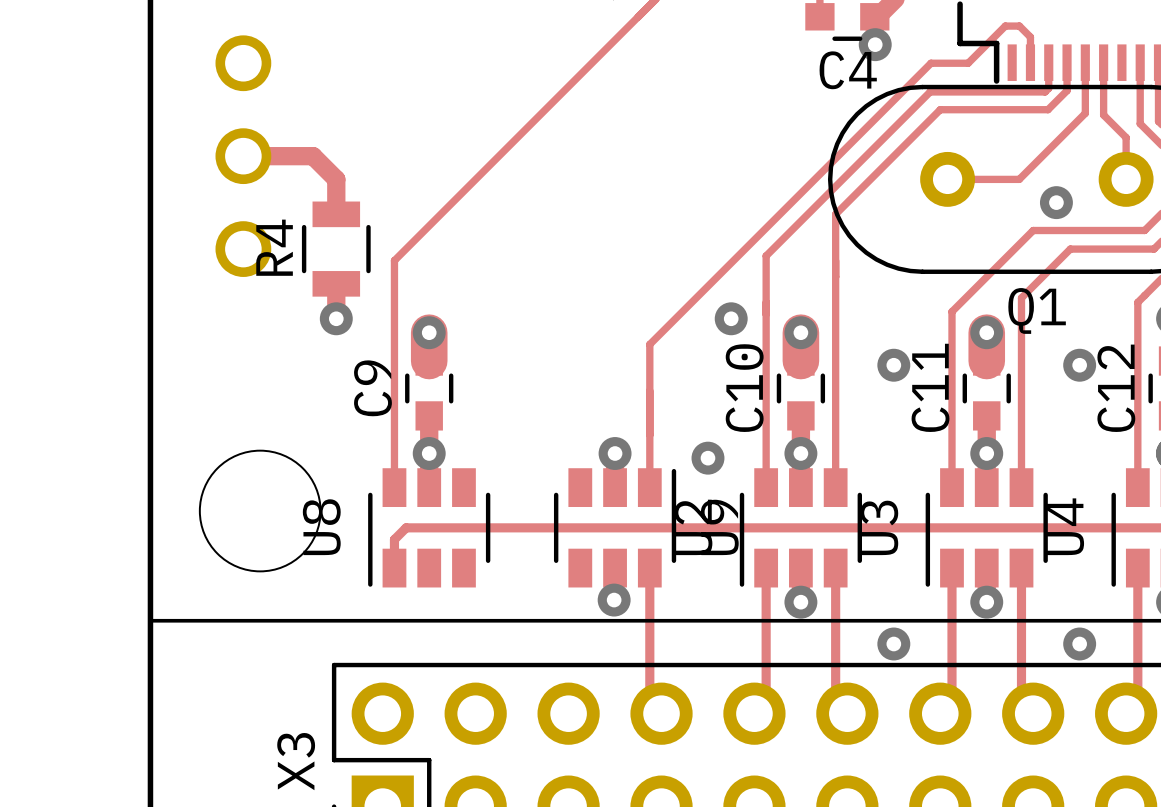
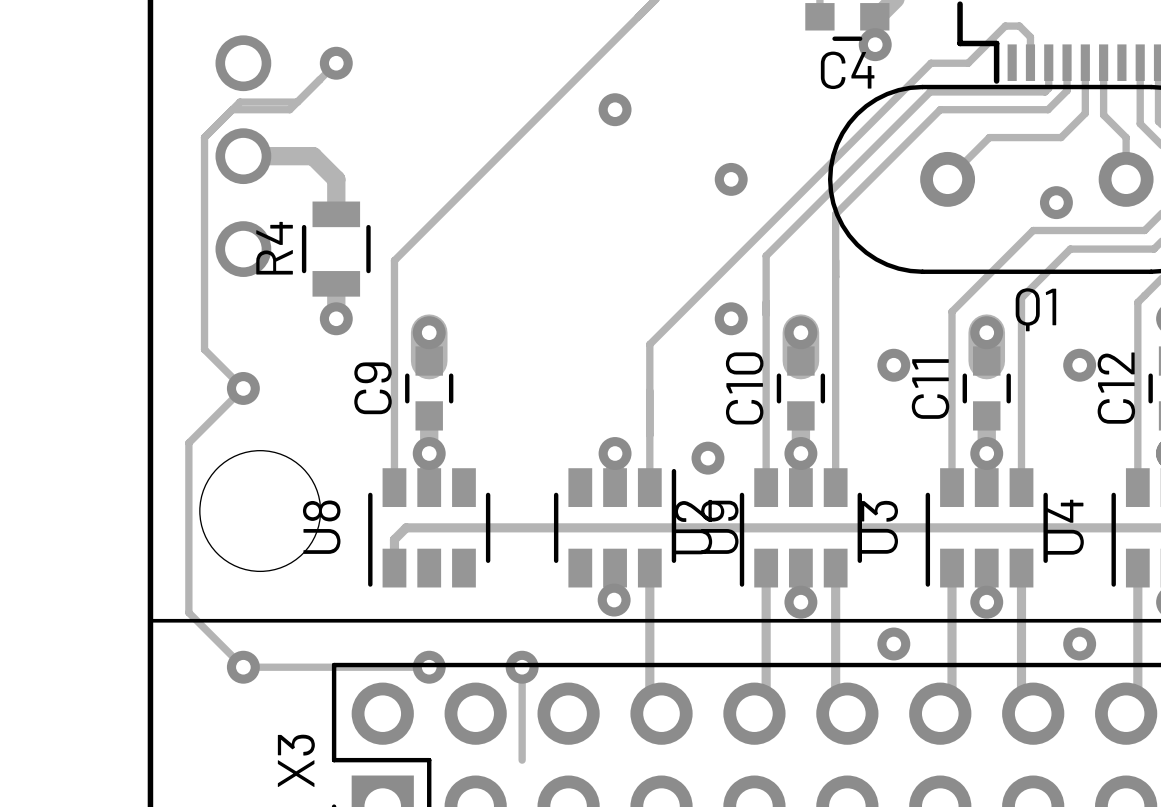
track: none -> (336, 63) (289, 109) (232, 109)
via: none -> (336, 63)
track: none -> (297, 102) (239, 102) (204, 137) (204, 349) (243, 388) (188, 442) (188, 612) (243, 667) (429, 667)
via: none -> (615, 109)
track: (1061, 137) (1019, 179) (947, 179) -> (1061, 137) (989, 137) (947, 179)
via: none -> (731, 179)
via: none -> (243, 388)
via: none -> (243, 667)
via: none -> (429, 667)
track: none -> (522, 667) (522, 760)
via: none -> (522, 667)

